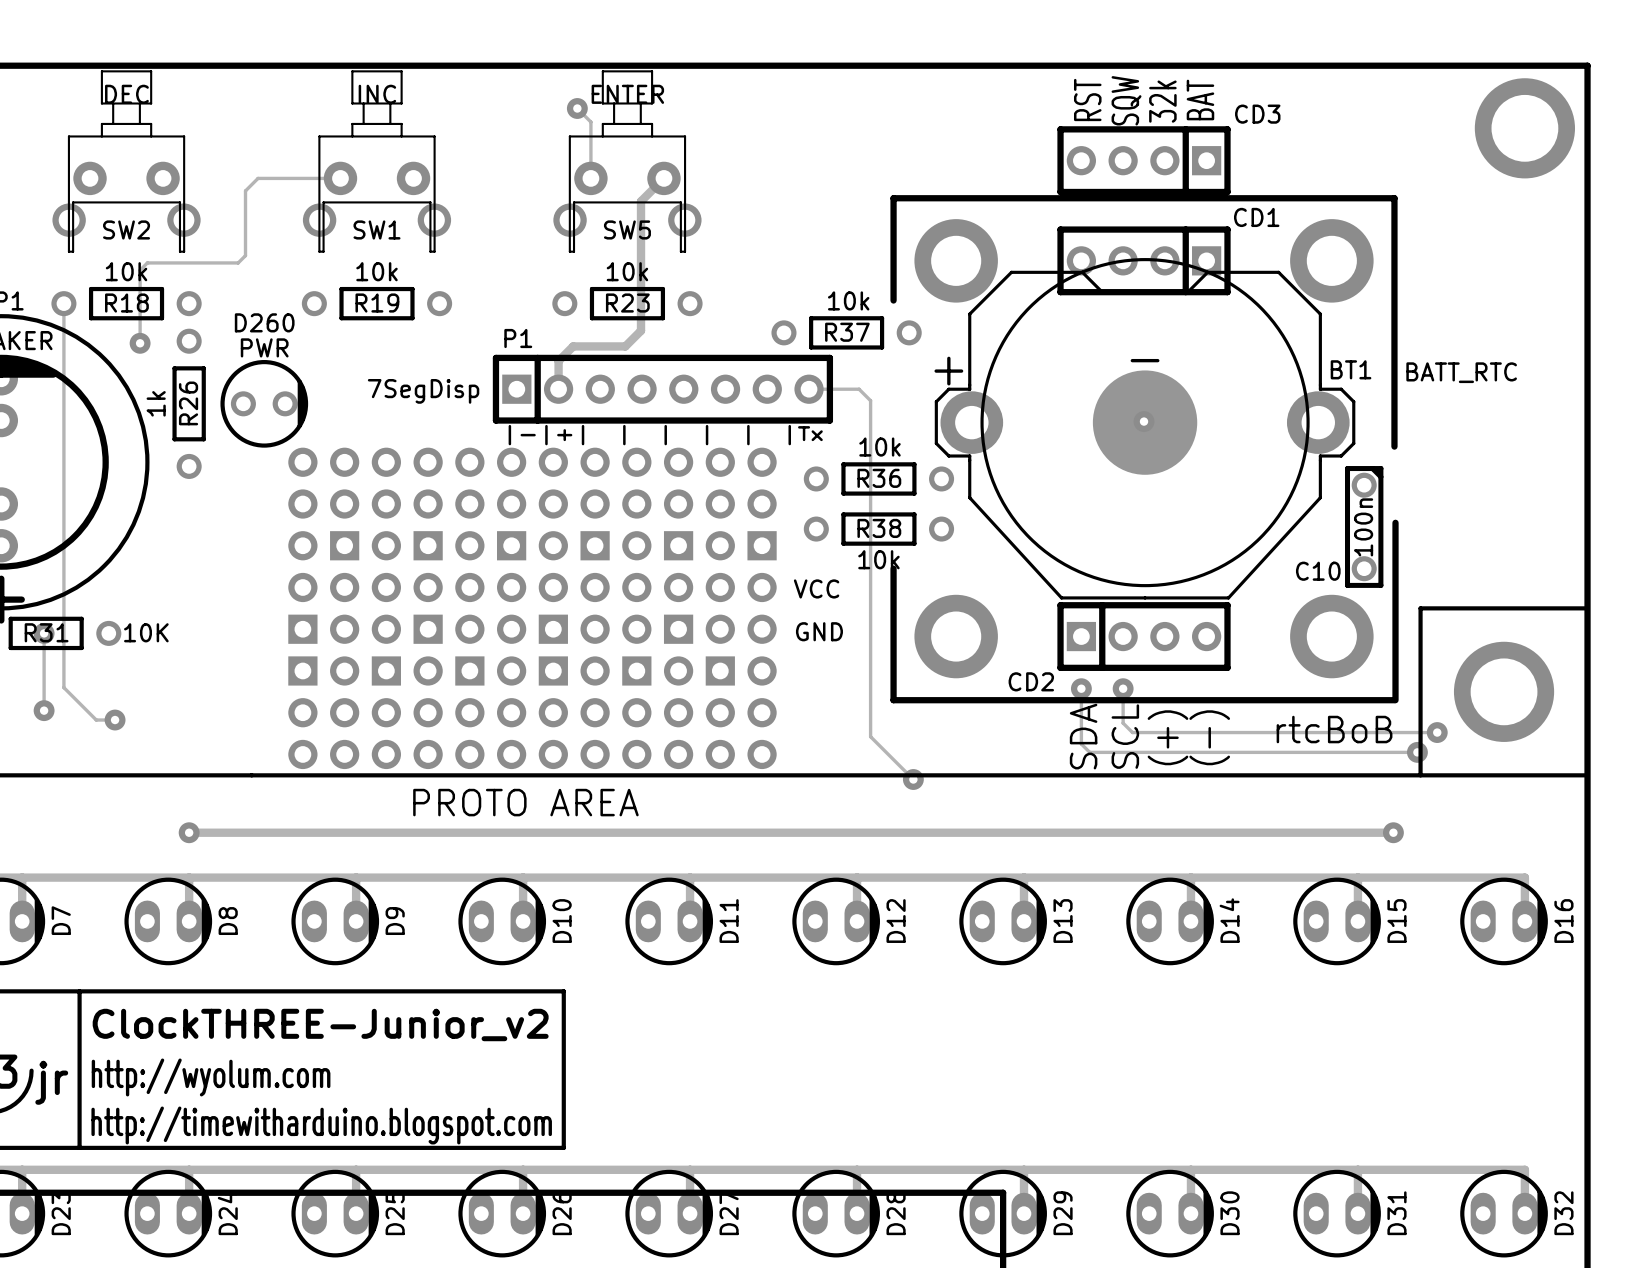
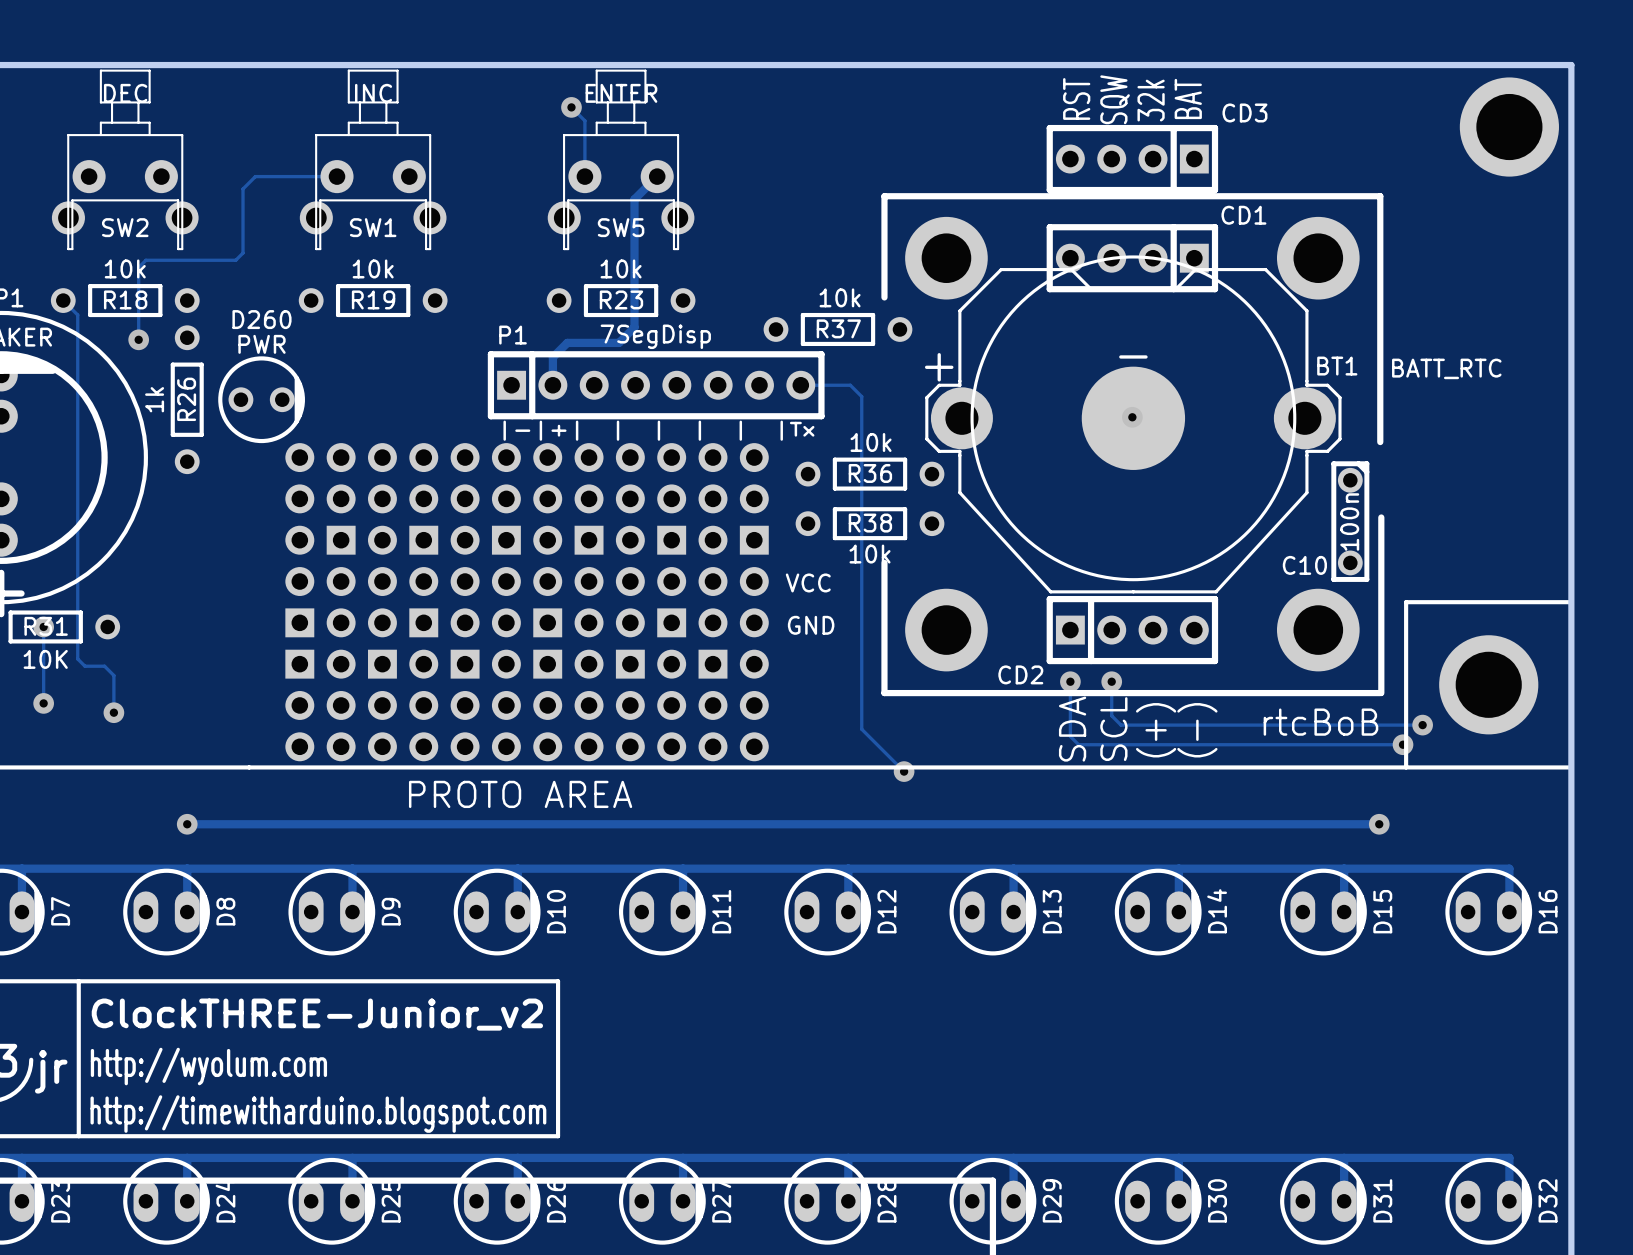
track: (63, 303) (63, 687) (96, 720) (115, 720) -> (63, 300) (77, 315) (77, 658) (84, 666) (104, 666) (113, 675) (113, 712)
P1 value position: 7SegDisp (423, 391) -> 7SegDisp (655, 336)
R31 value position: 10K (146, 632) -> 10K (45, 659)

